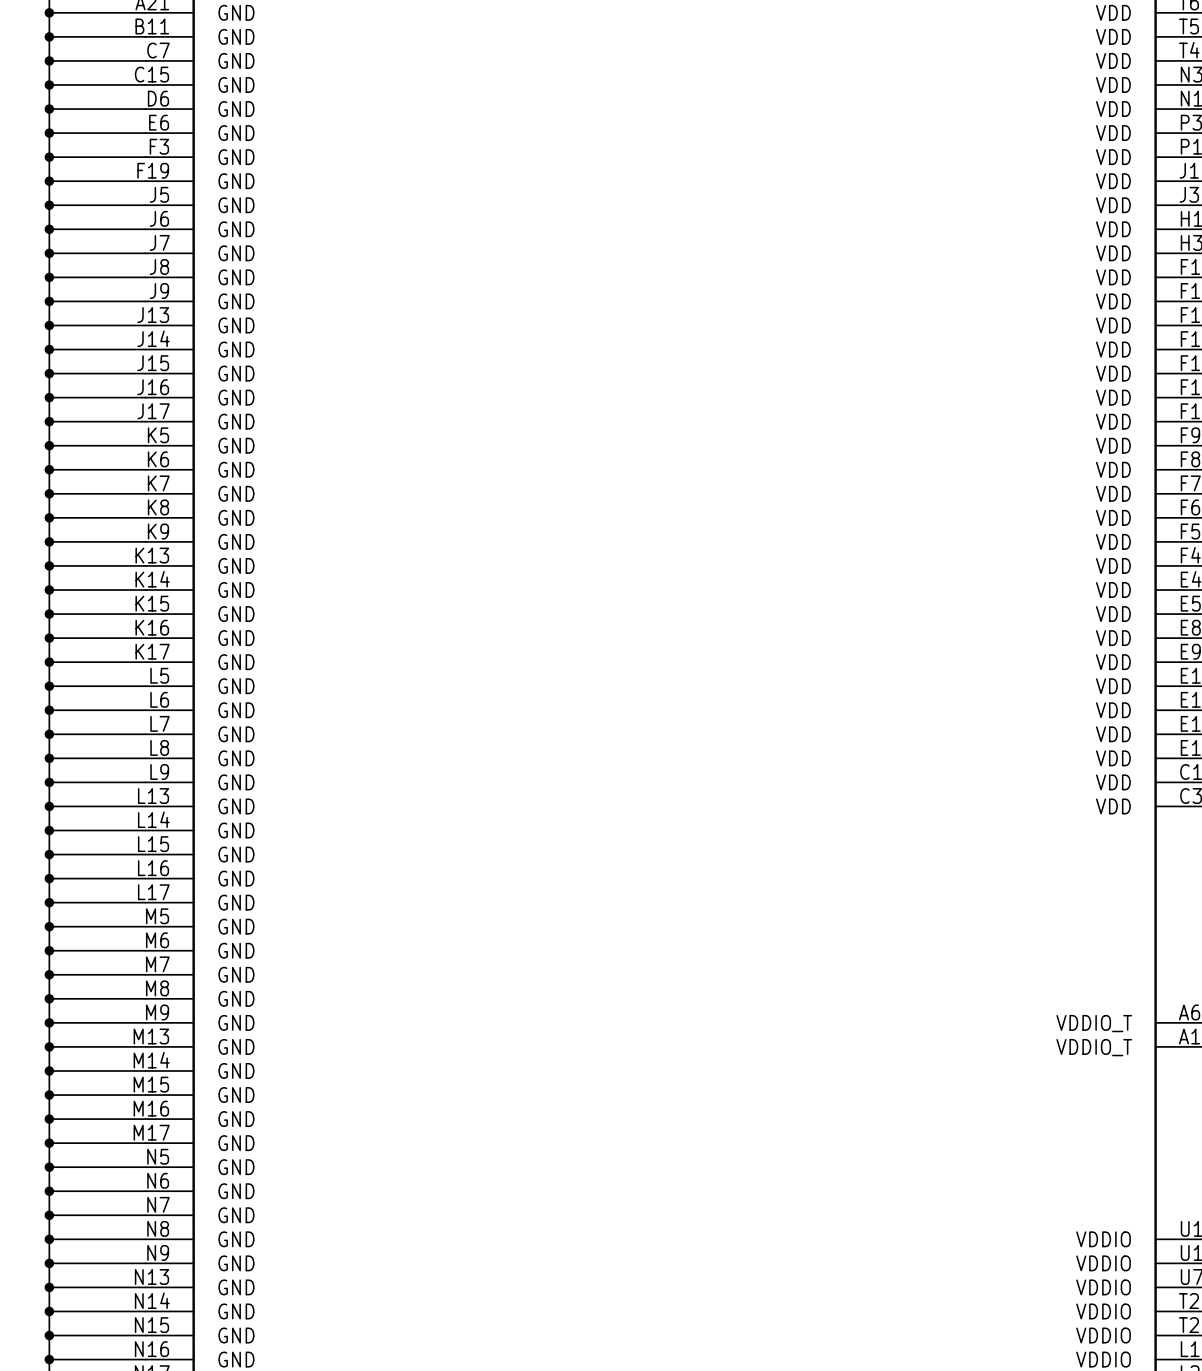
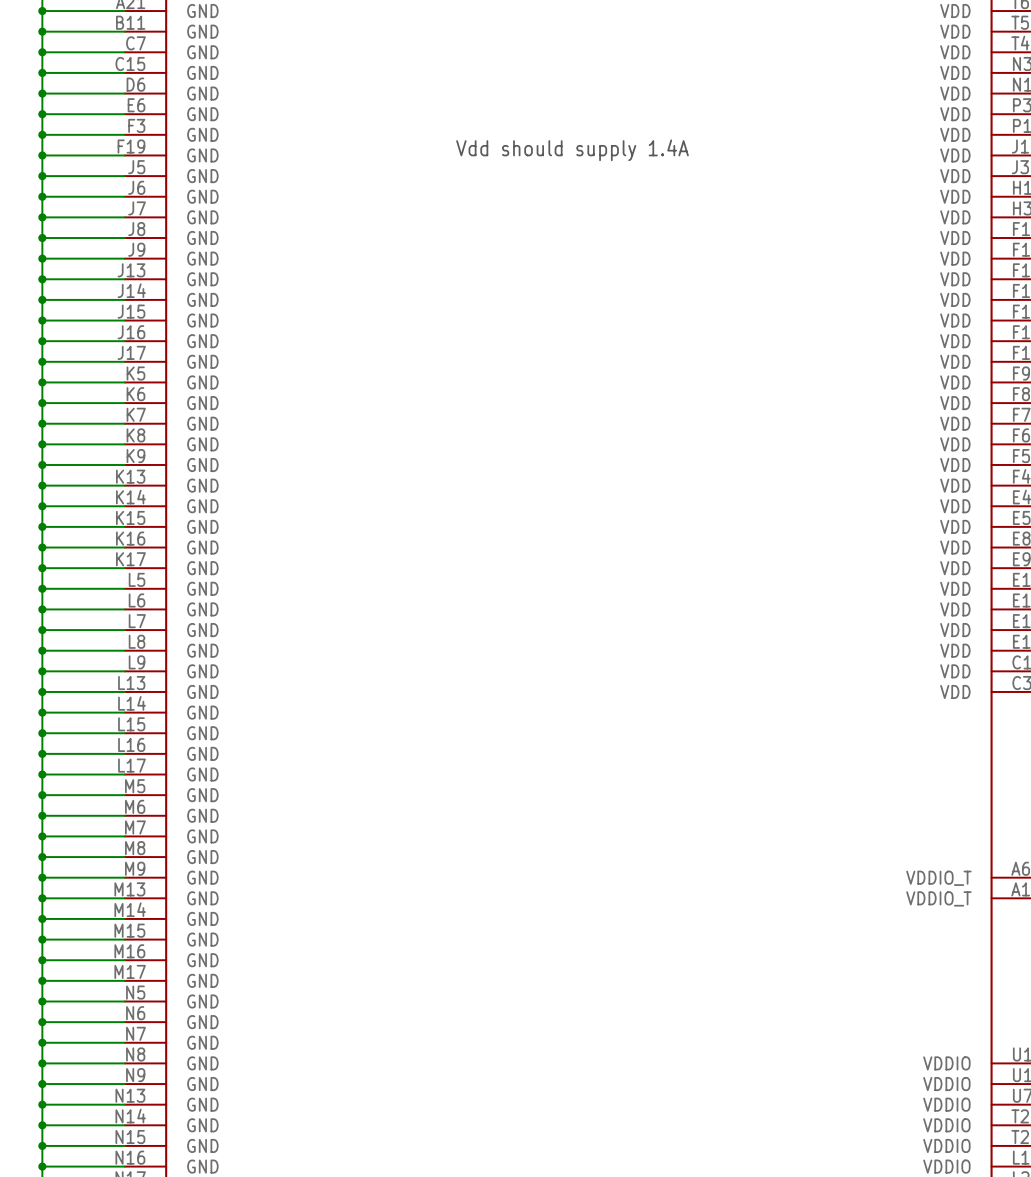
text: none -> Vdd should supply 1.4A (572, 150)

